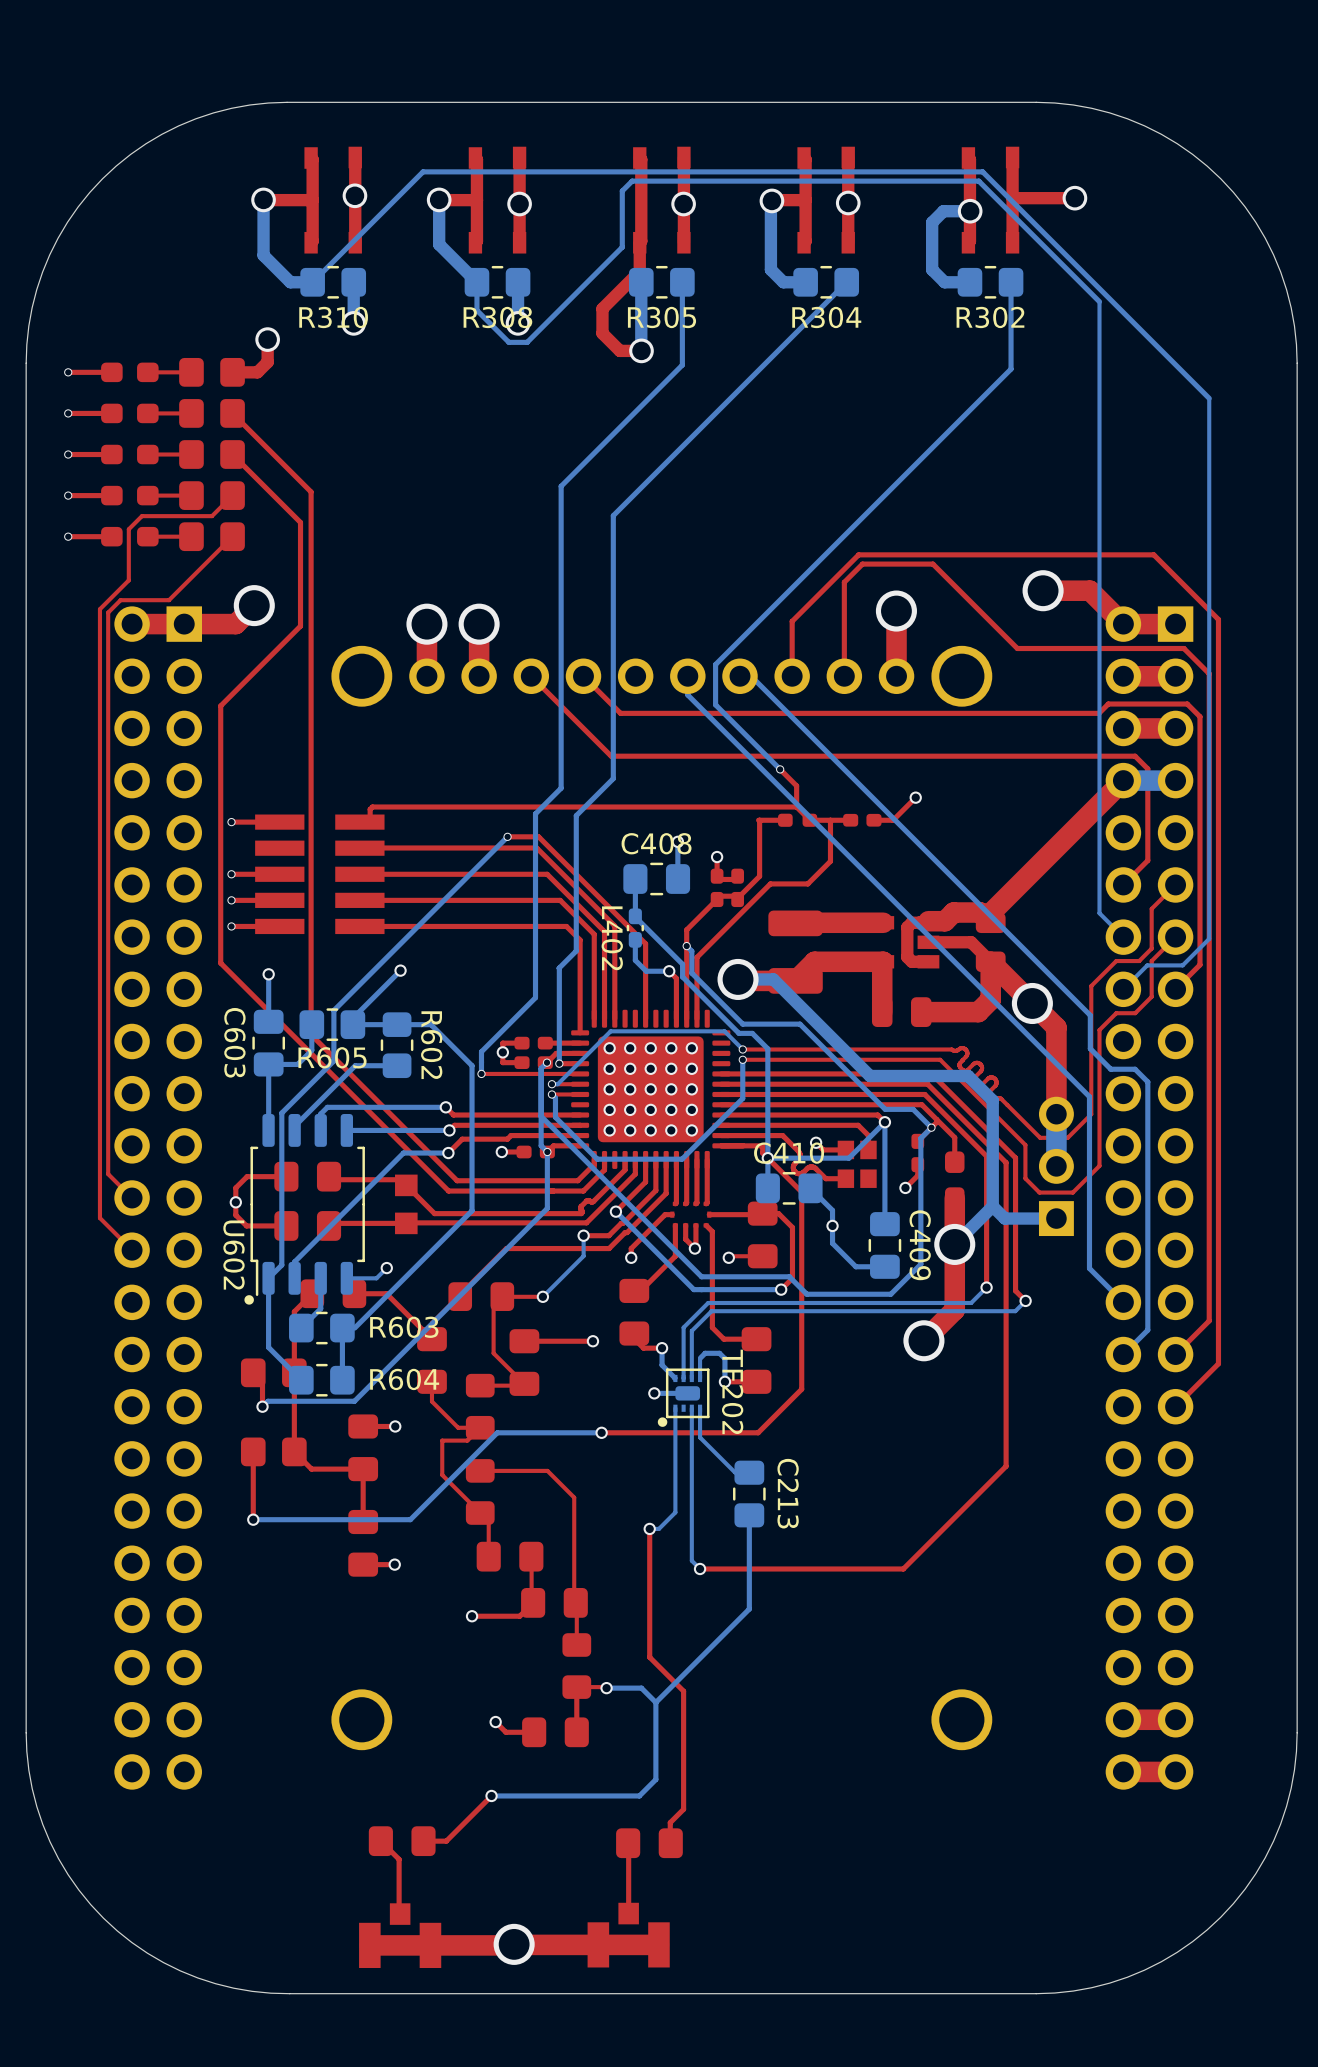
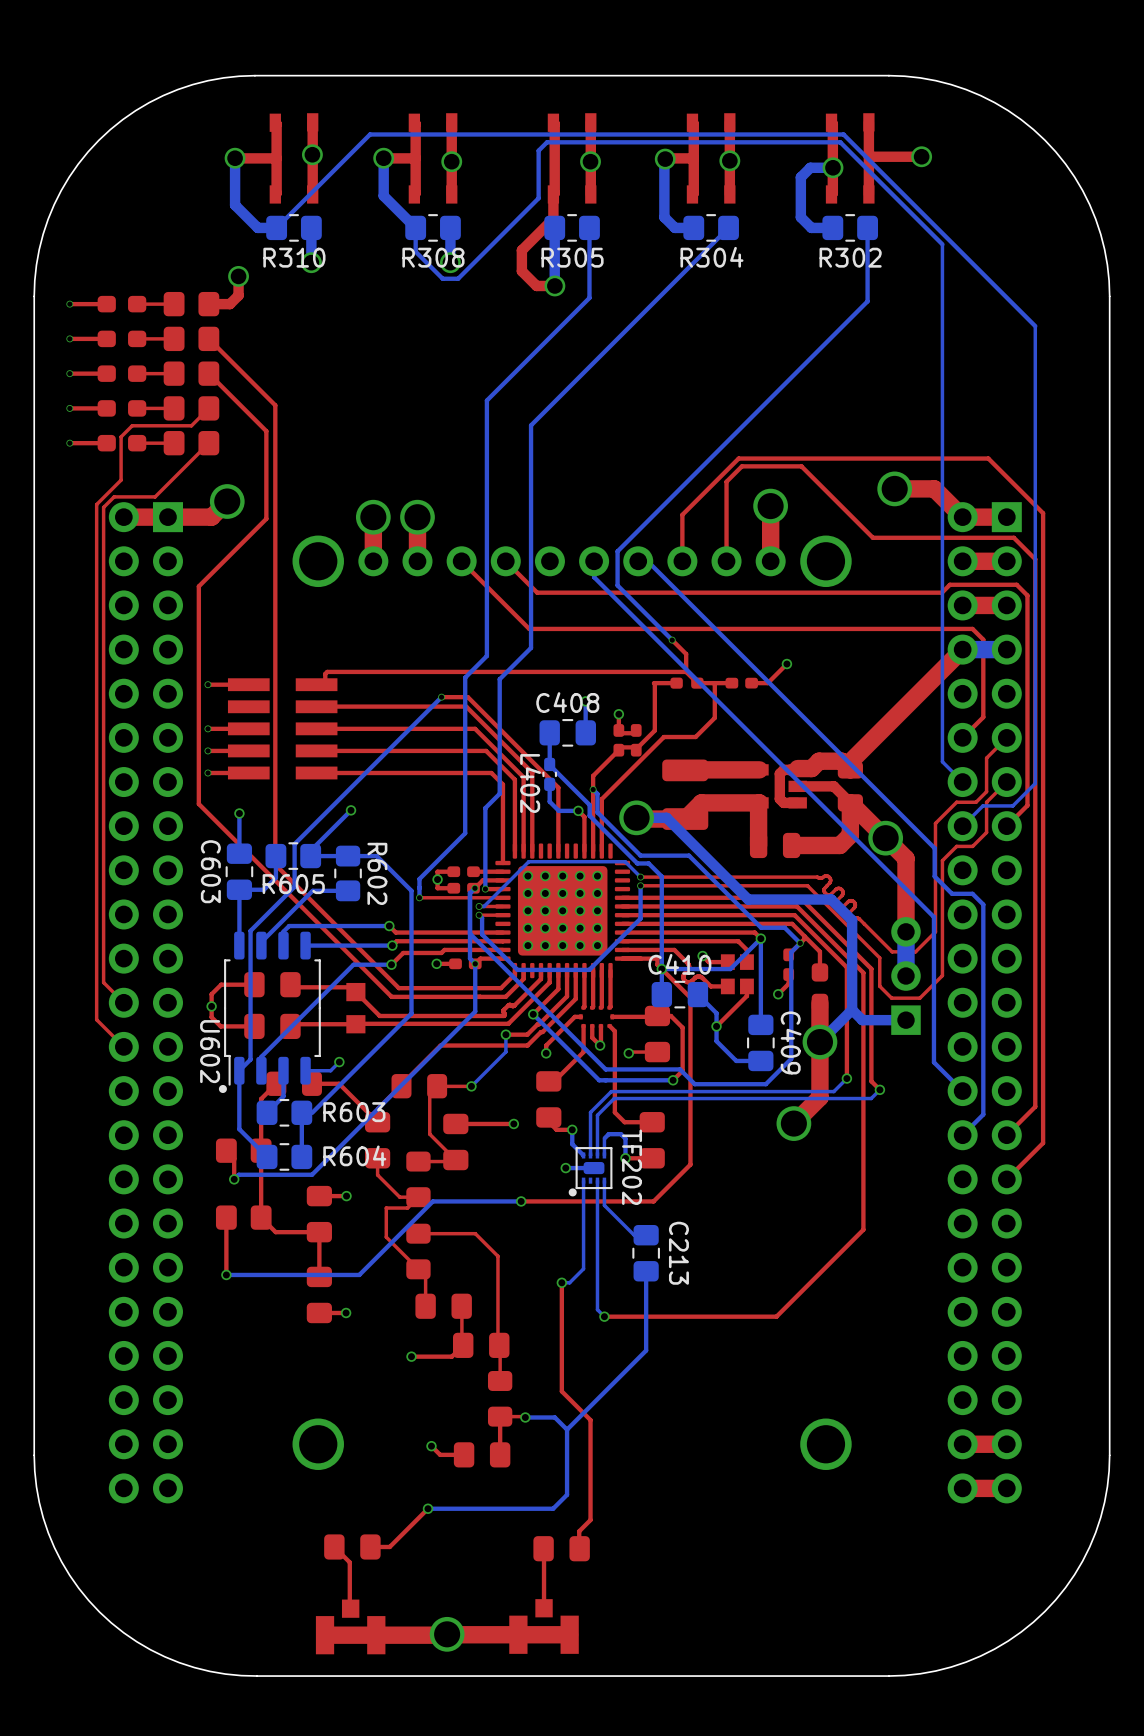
top track: none -> (746, 986) (746, 995) (716, 1026)

